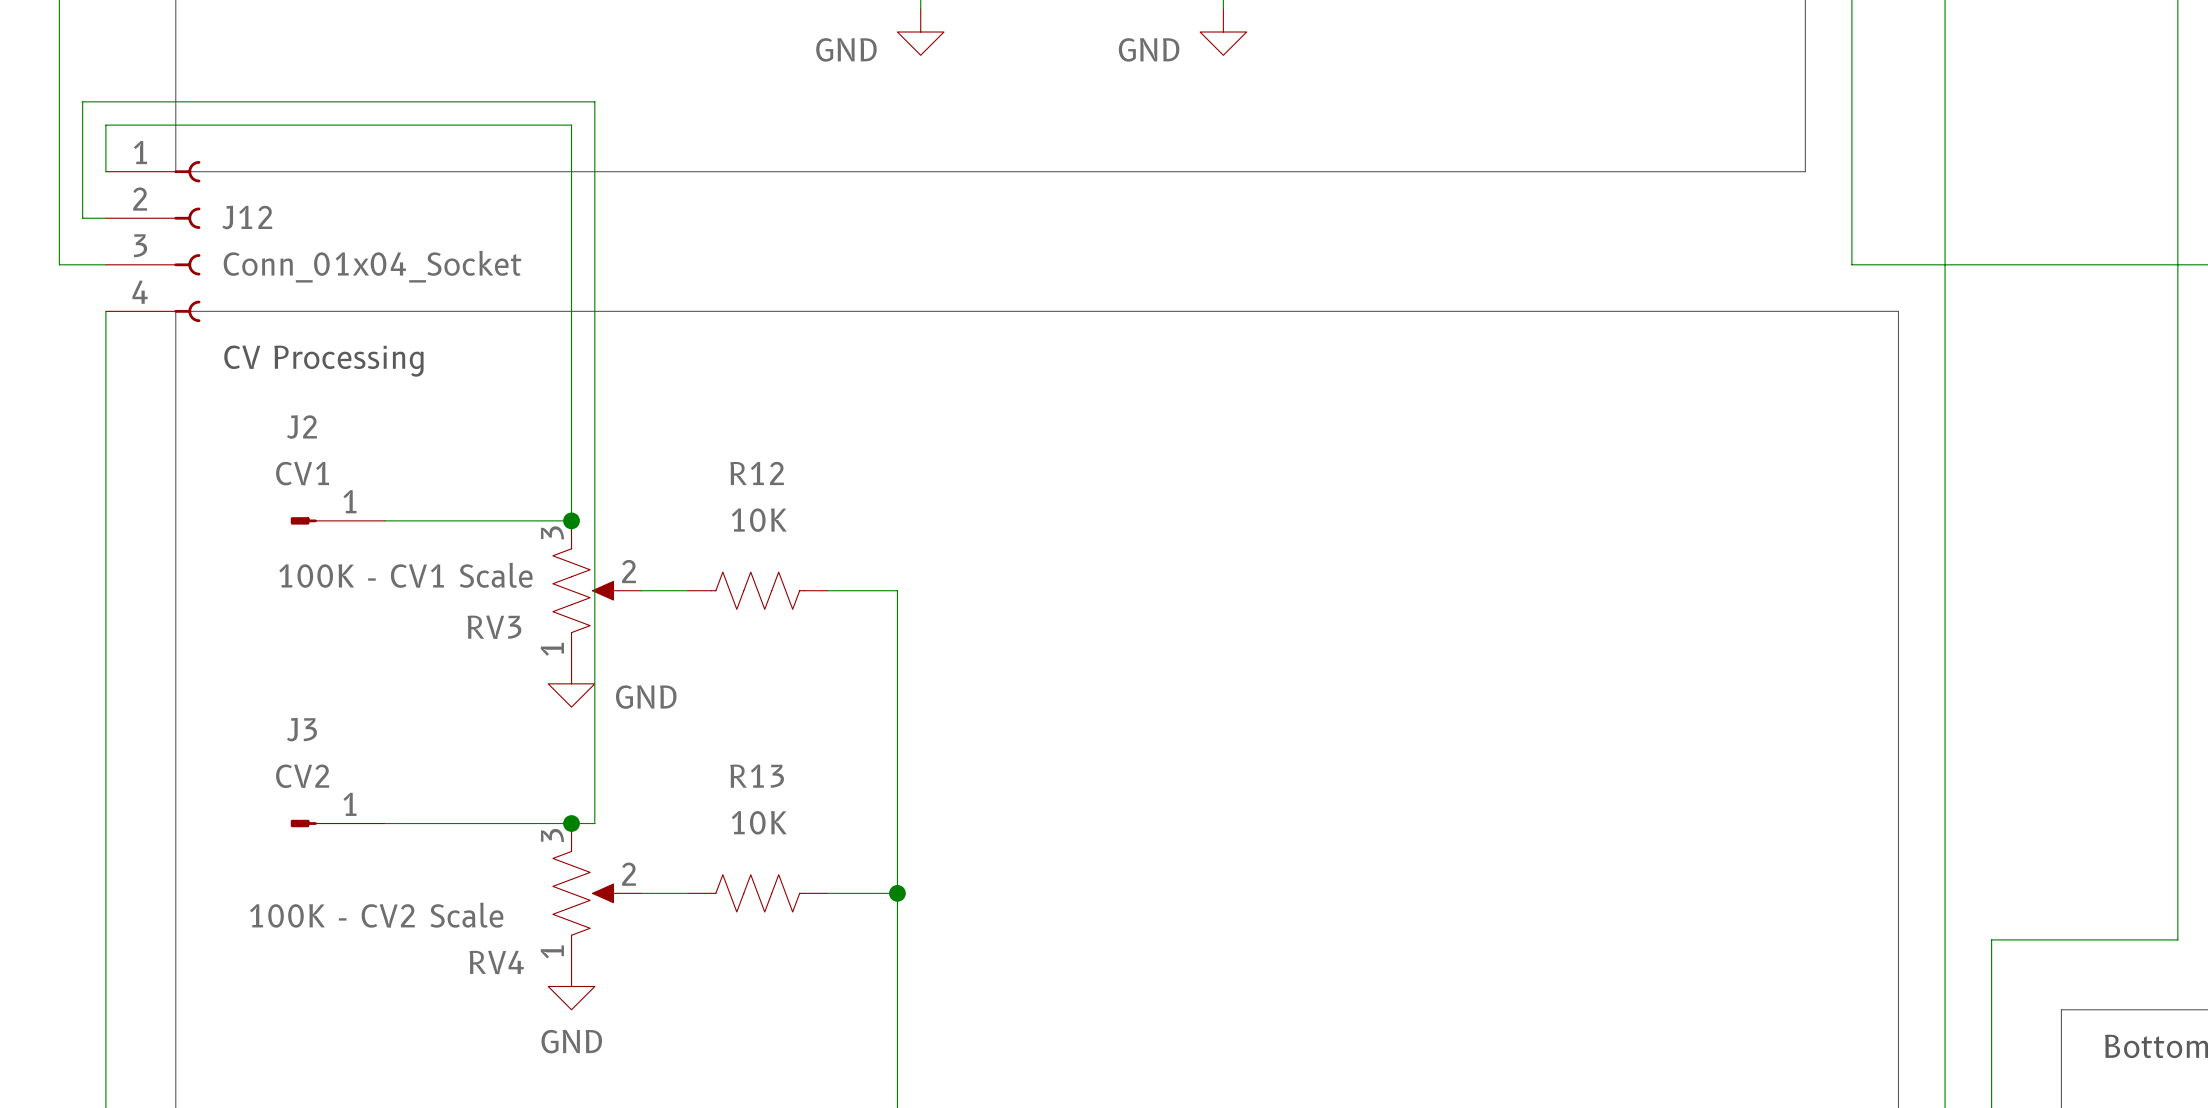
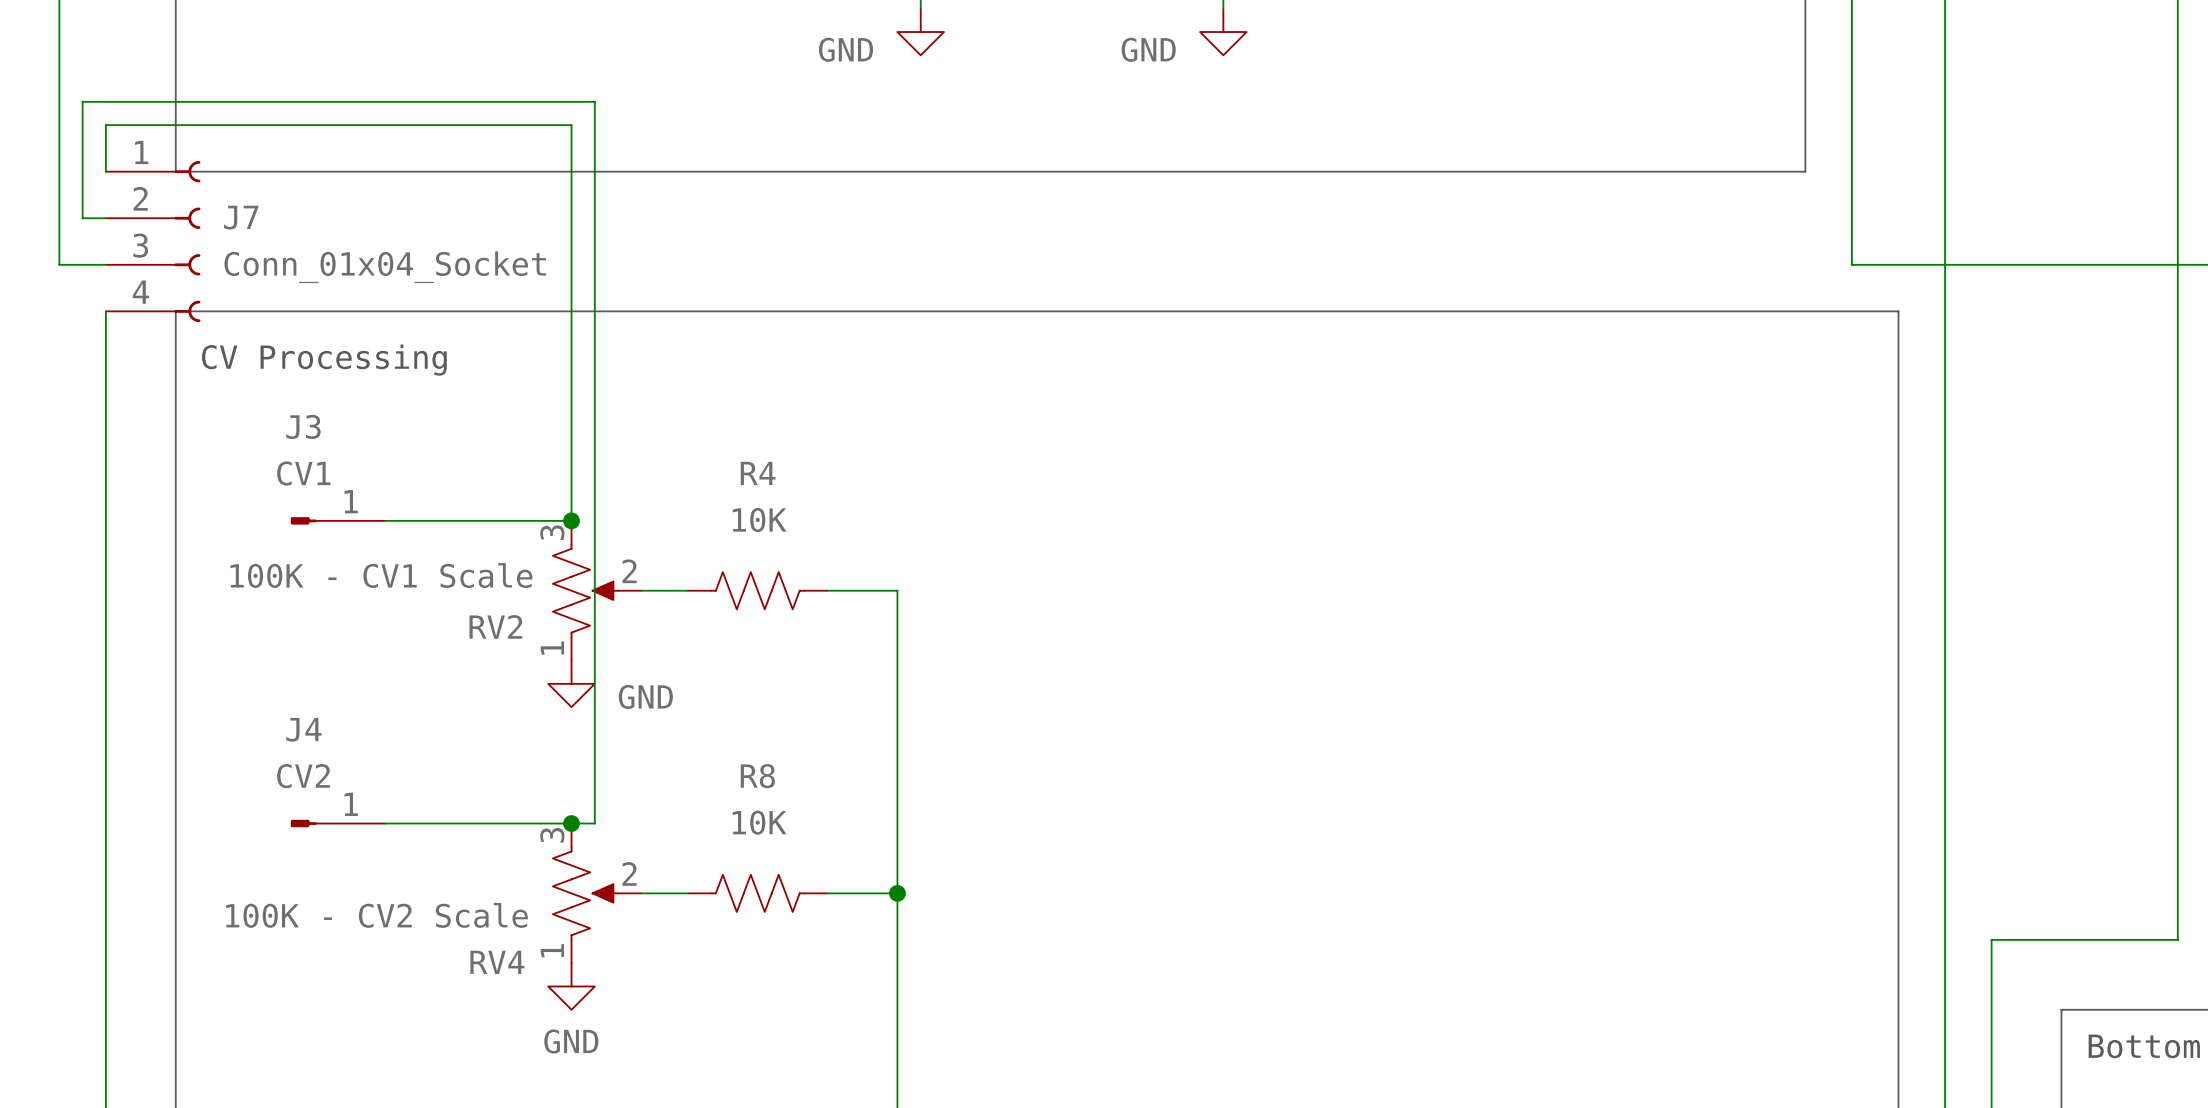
J12 name: J12 (247, 217) -> J7 (241, 217)
J2 name: J2 (301, 427) -> J3 (303, 426)
R12 name: R12 (757, 473) -> R4 (758, 473)
RV3 name: RV3 (494, 627) -> RV2 (495, 626)
J3 name: J3 (301, 729) -> J4 (303, 729)
R13 name: R13 (757, 776) -> R8 (757, 776)

